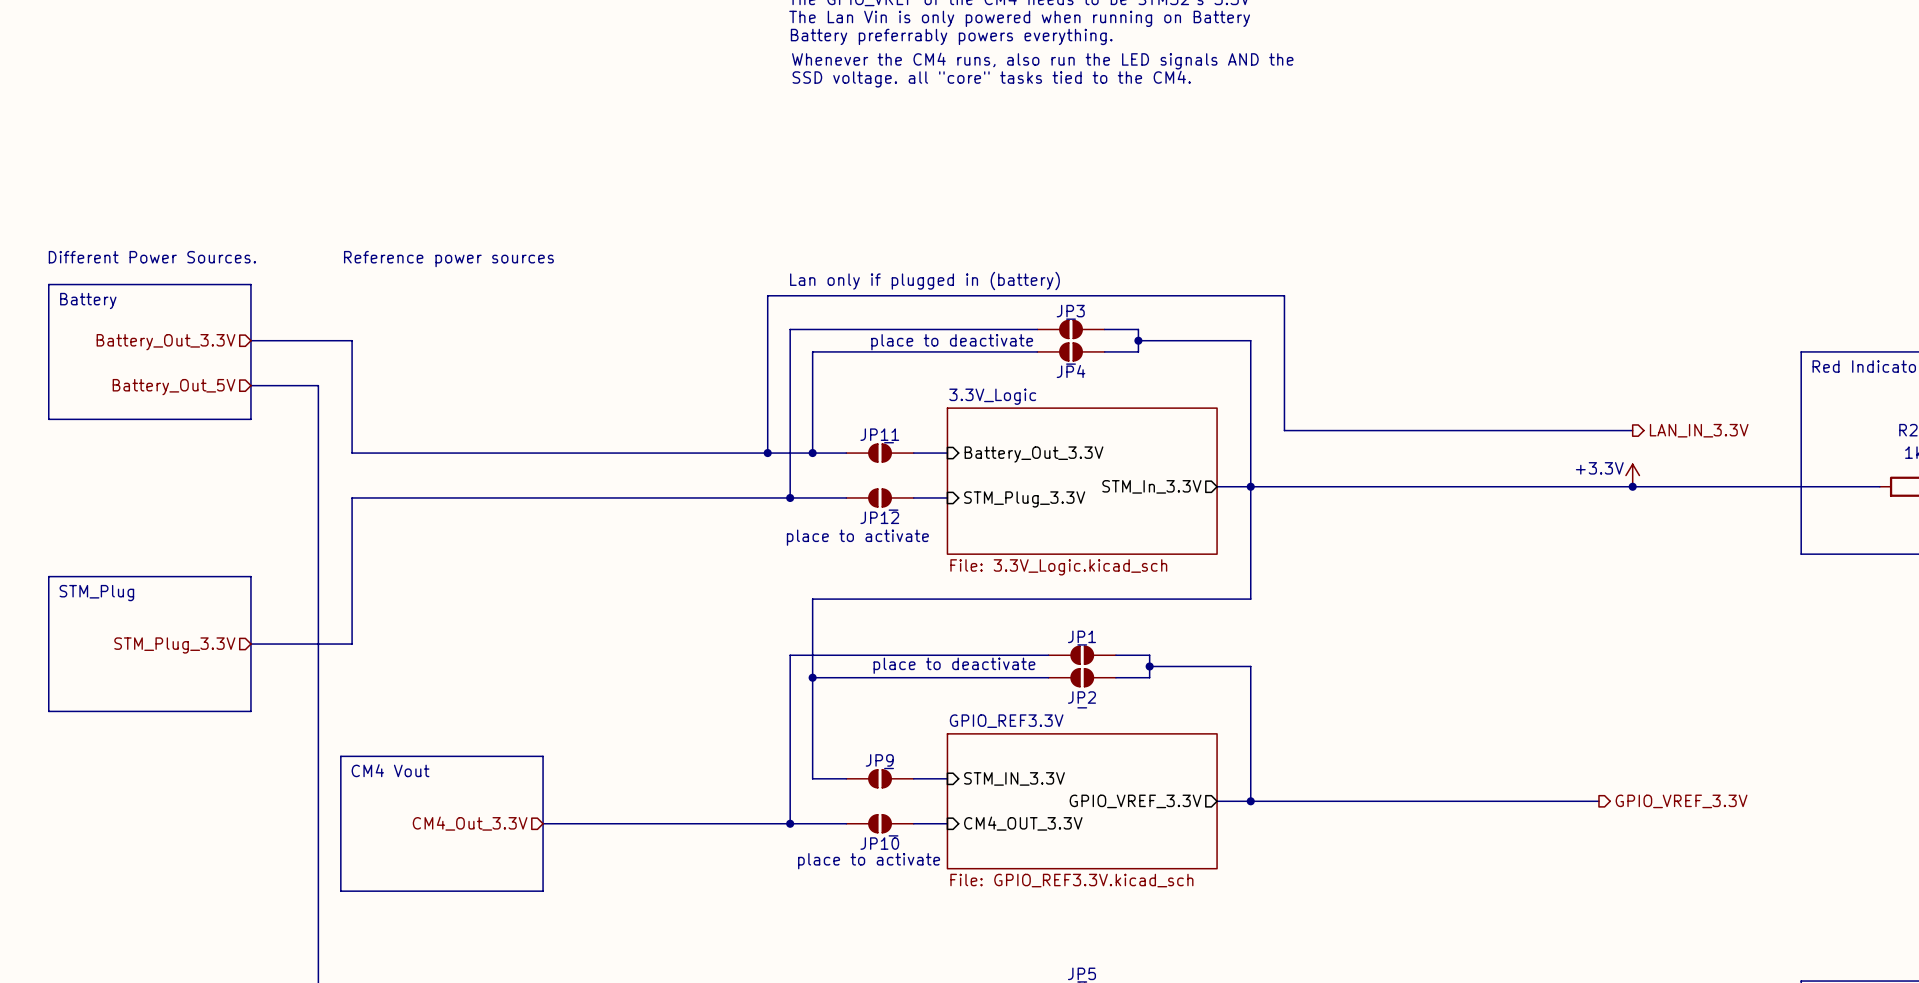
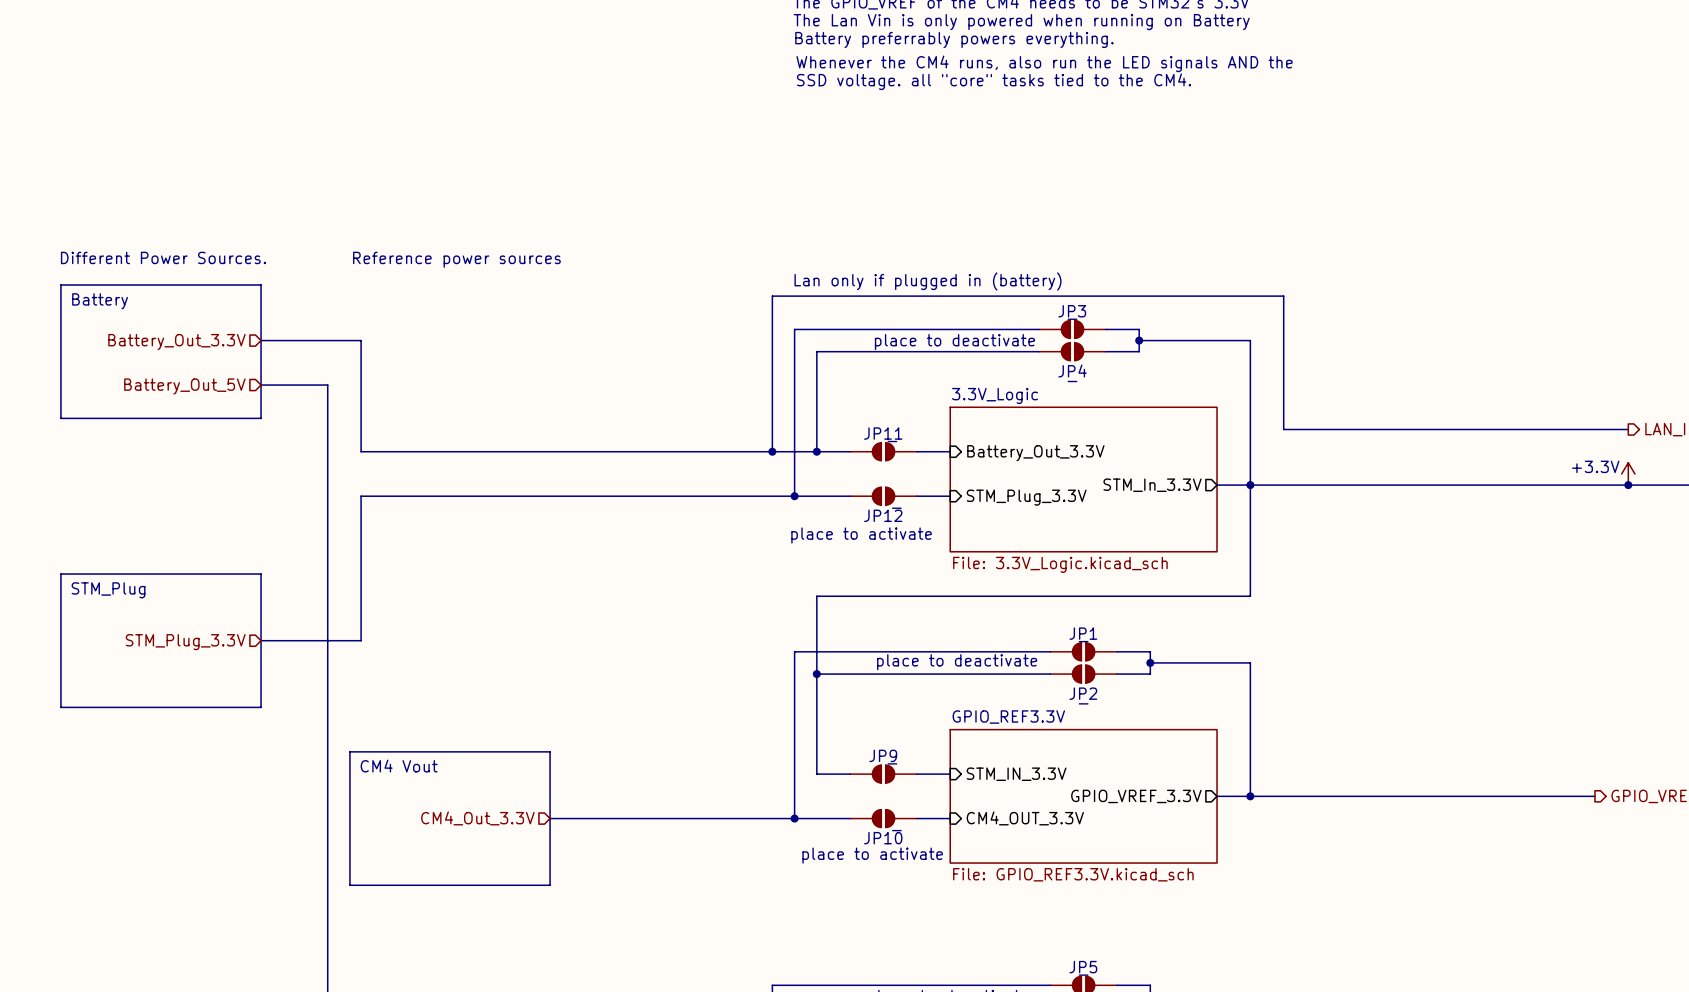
JP3 value position: - (1071, 319) -> - (1072, 381)
JP4 value position: - (1071, 364) -> - (1072, 319)

